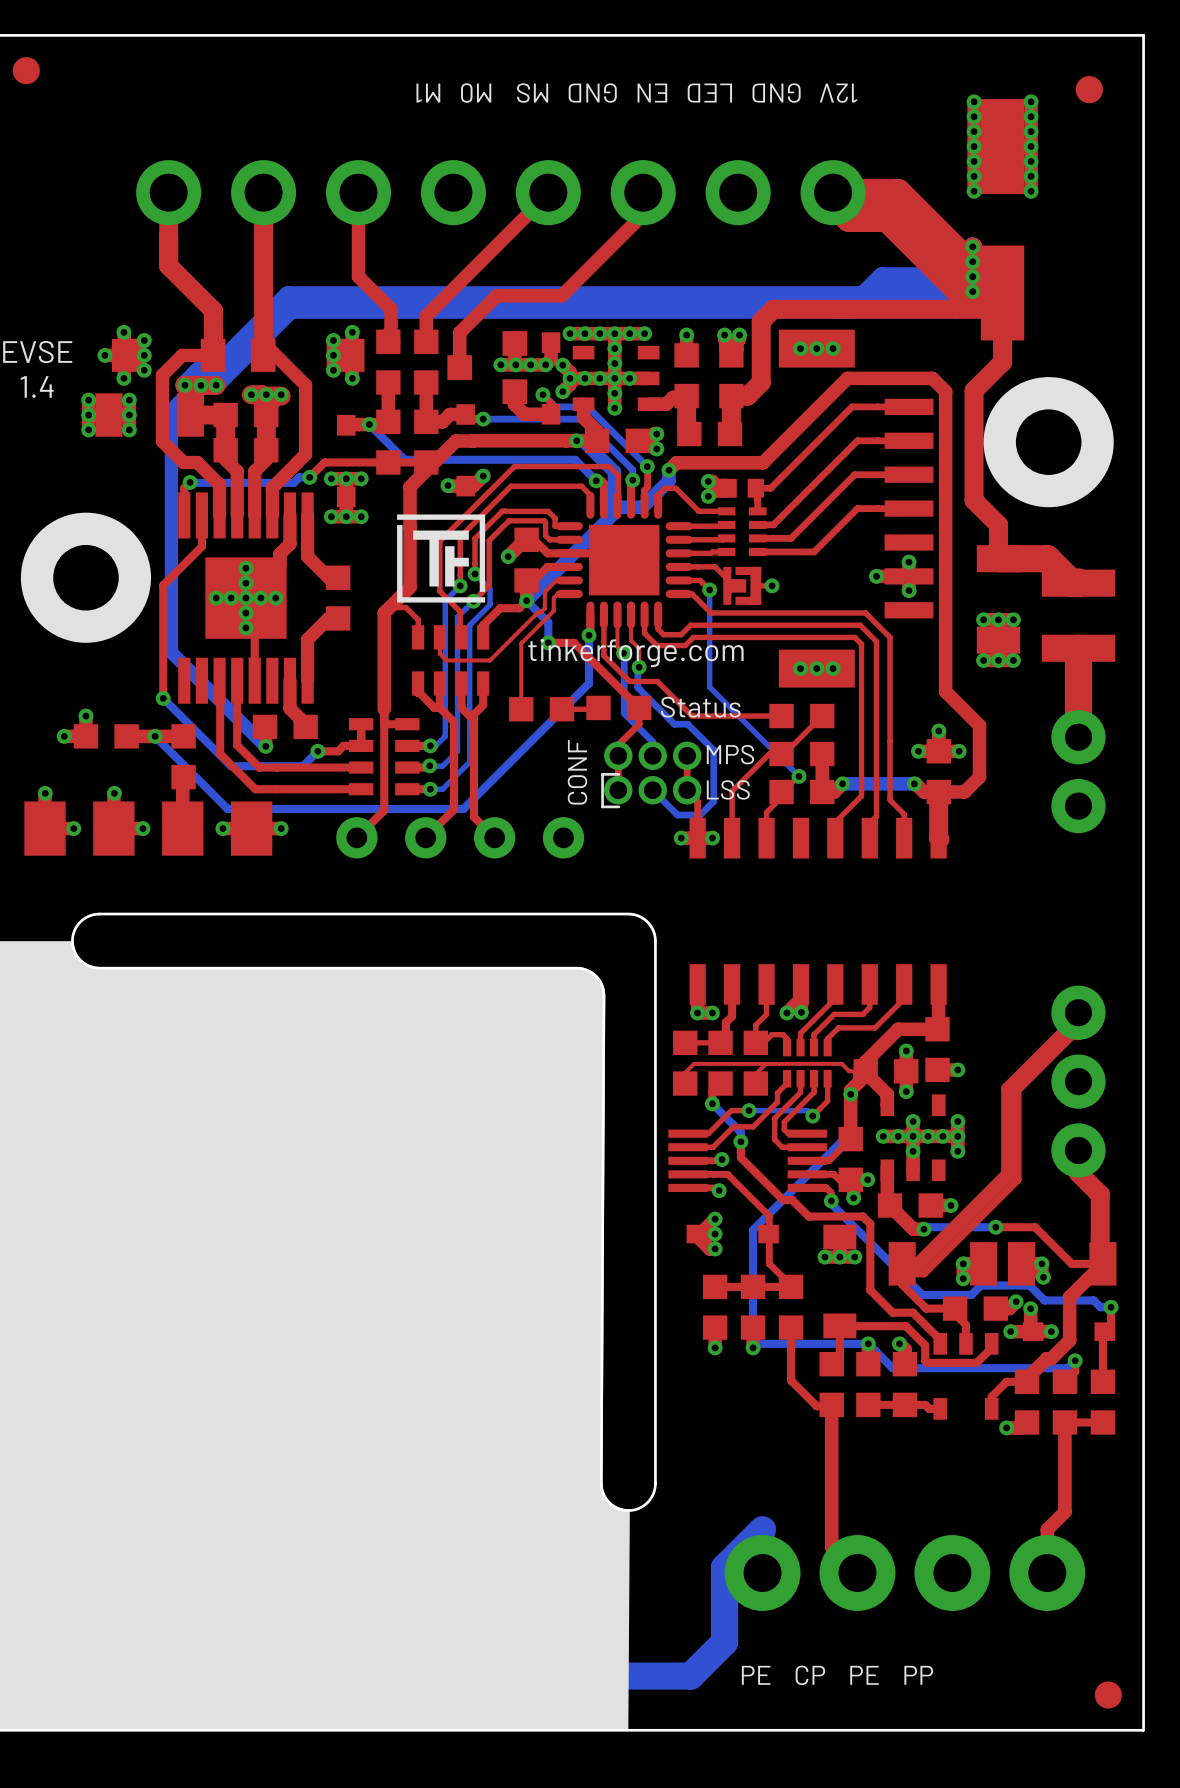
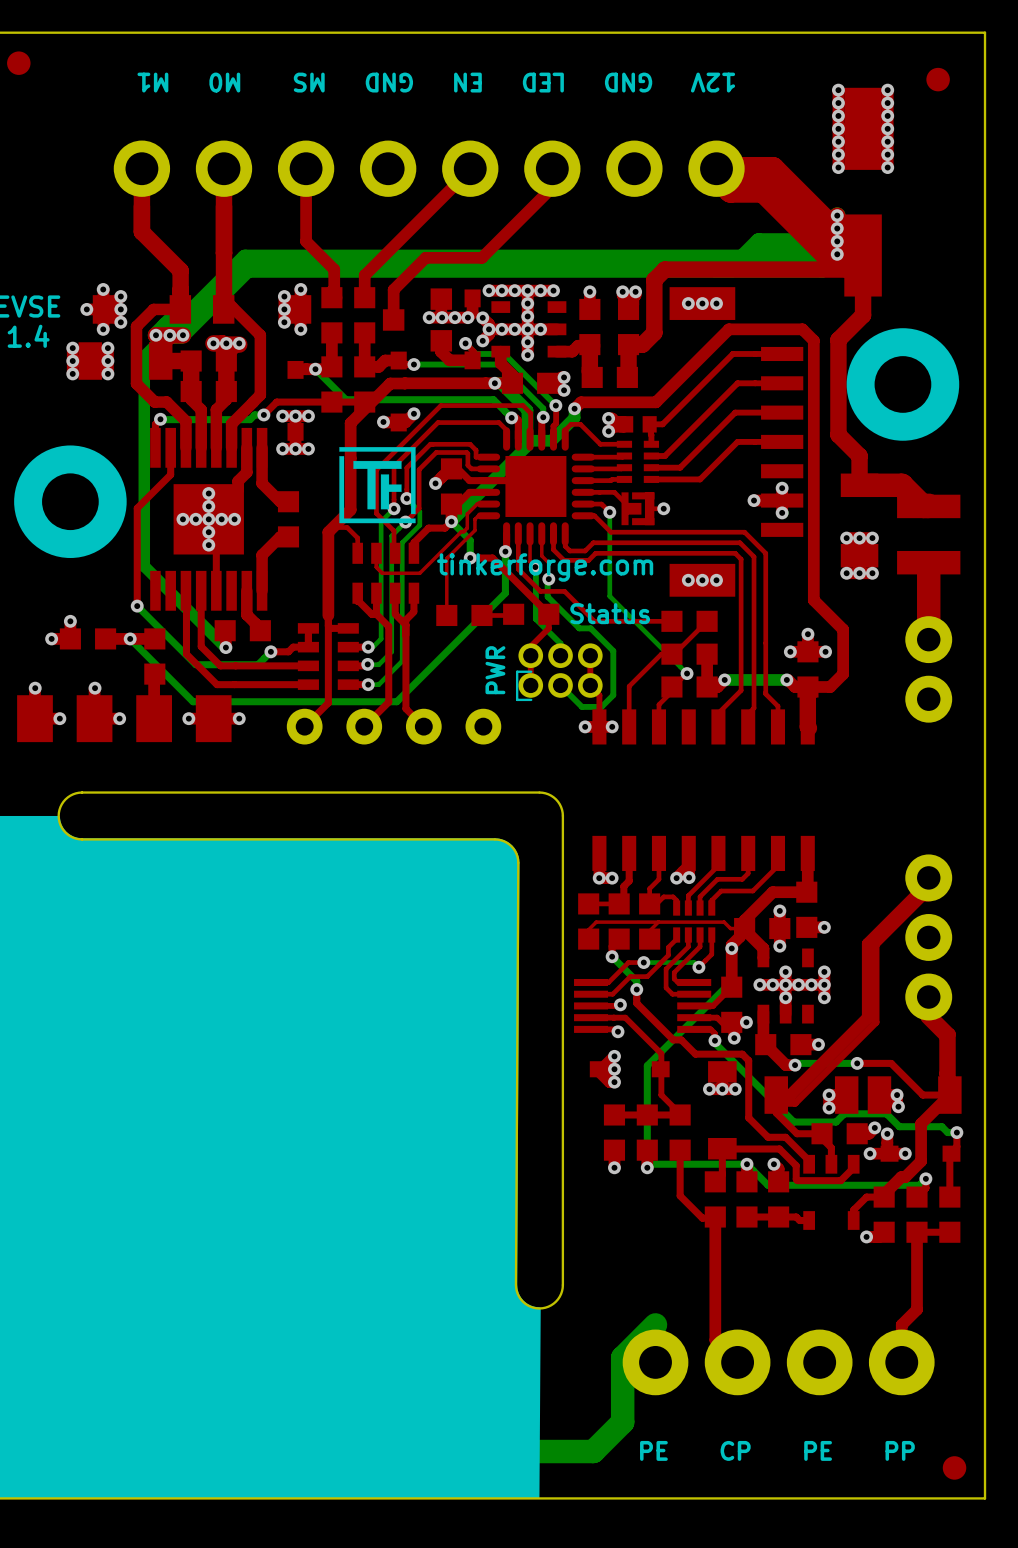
text: MPS (730, 754) -> none
text: CONF (577, 772) -> PWR (495, 670)
text: LSS (728, 789) -> none

